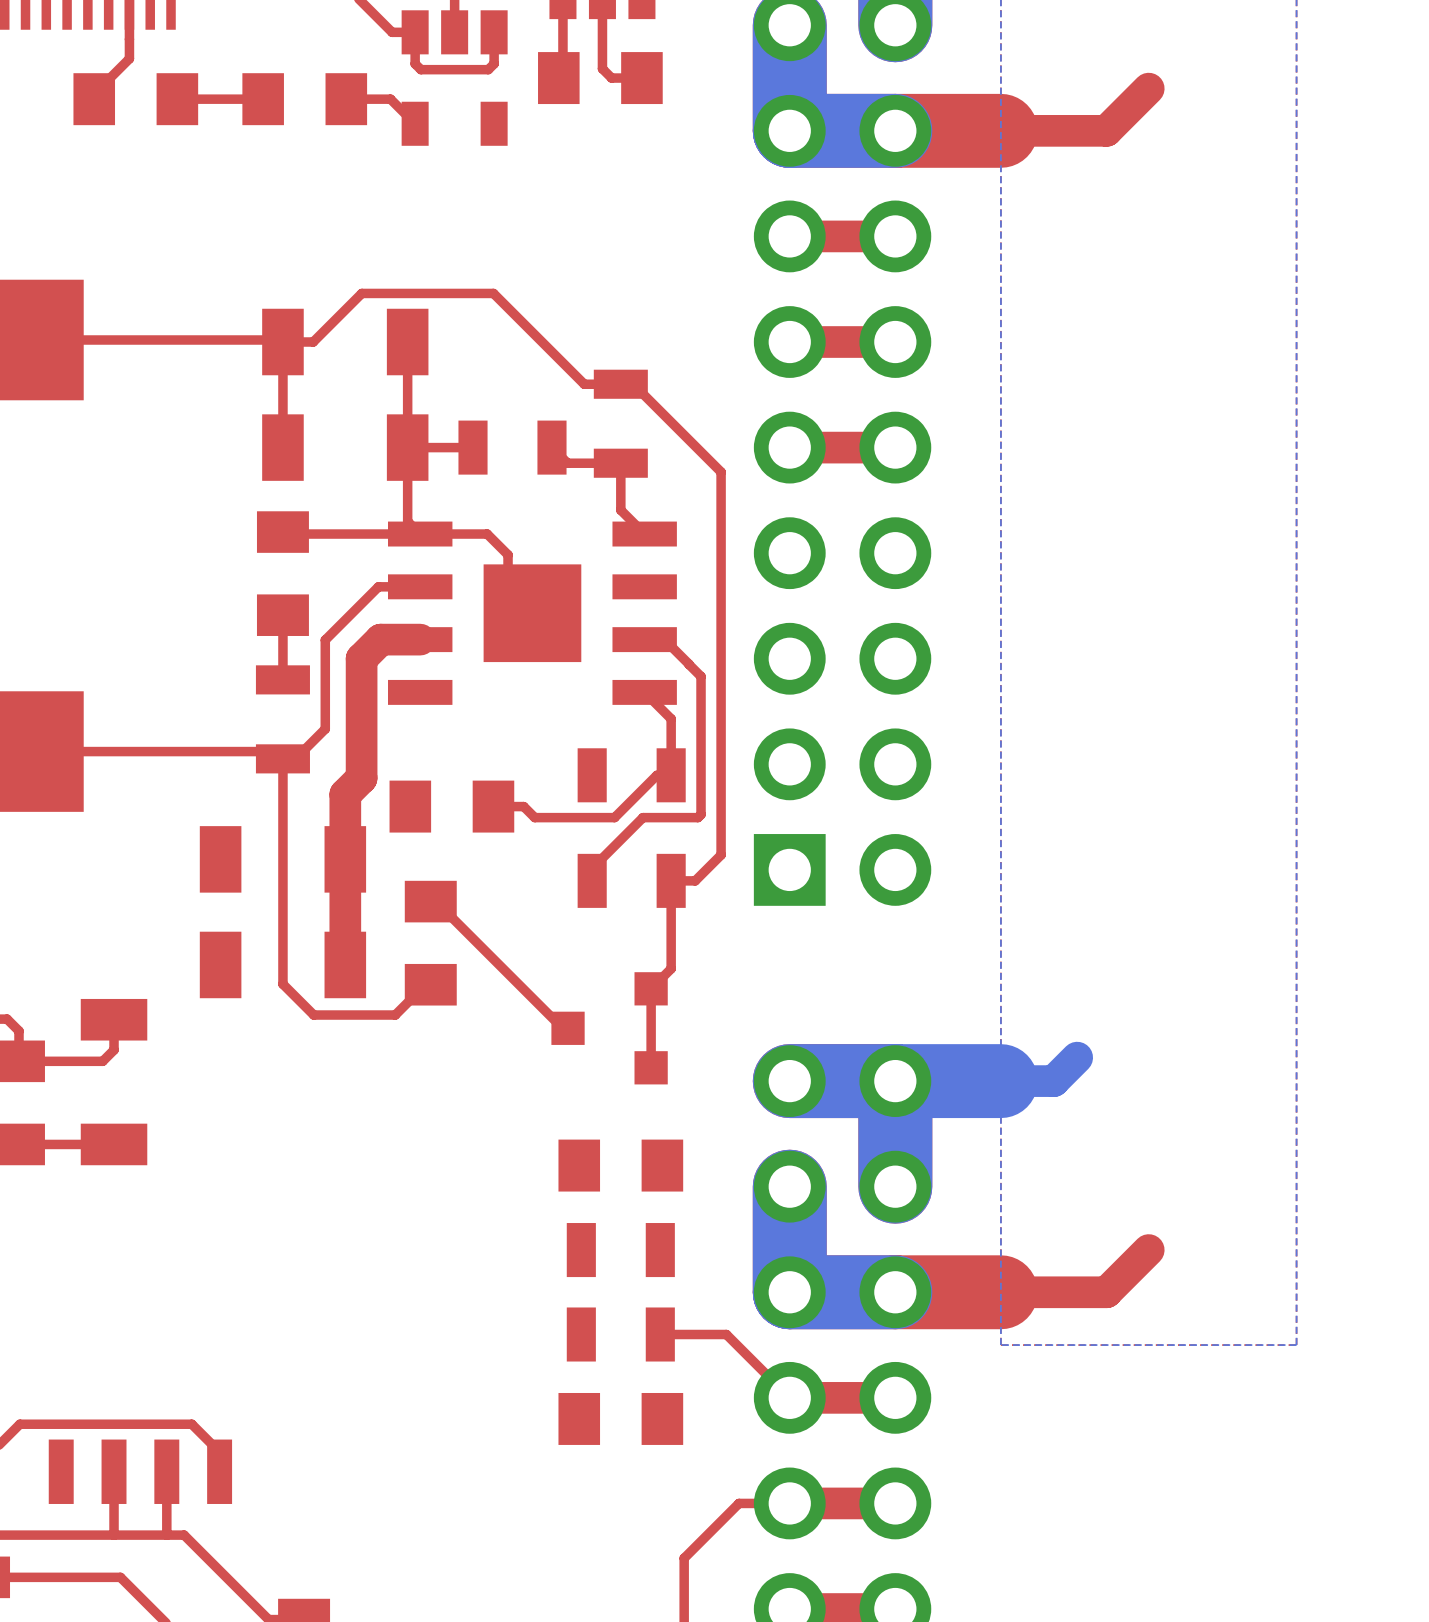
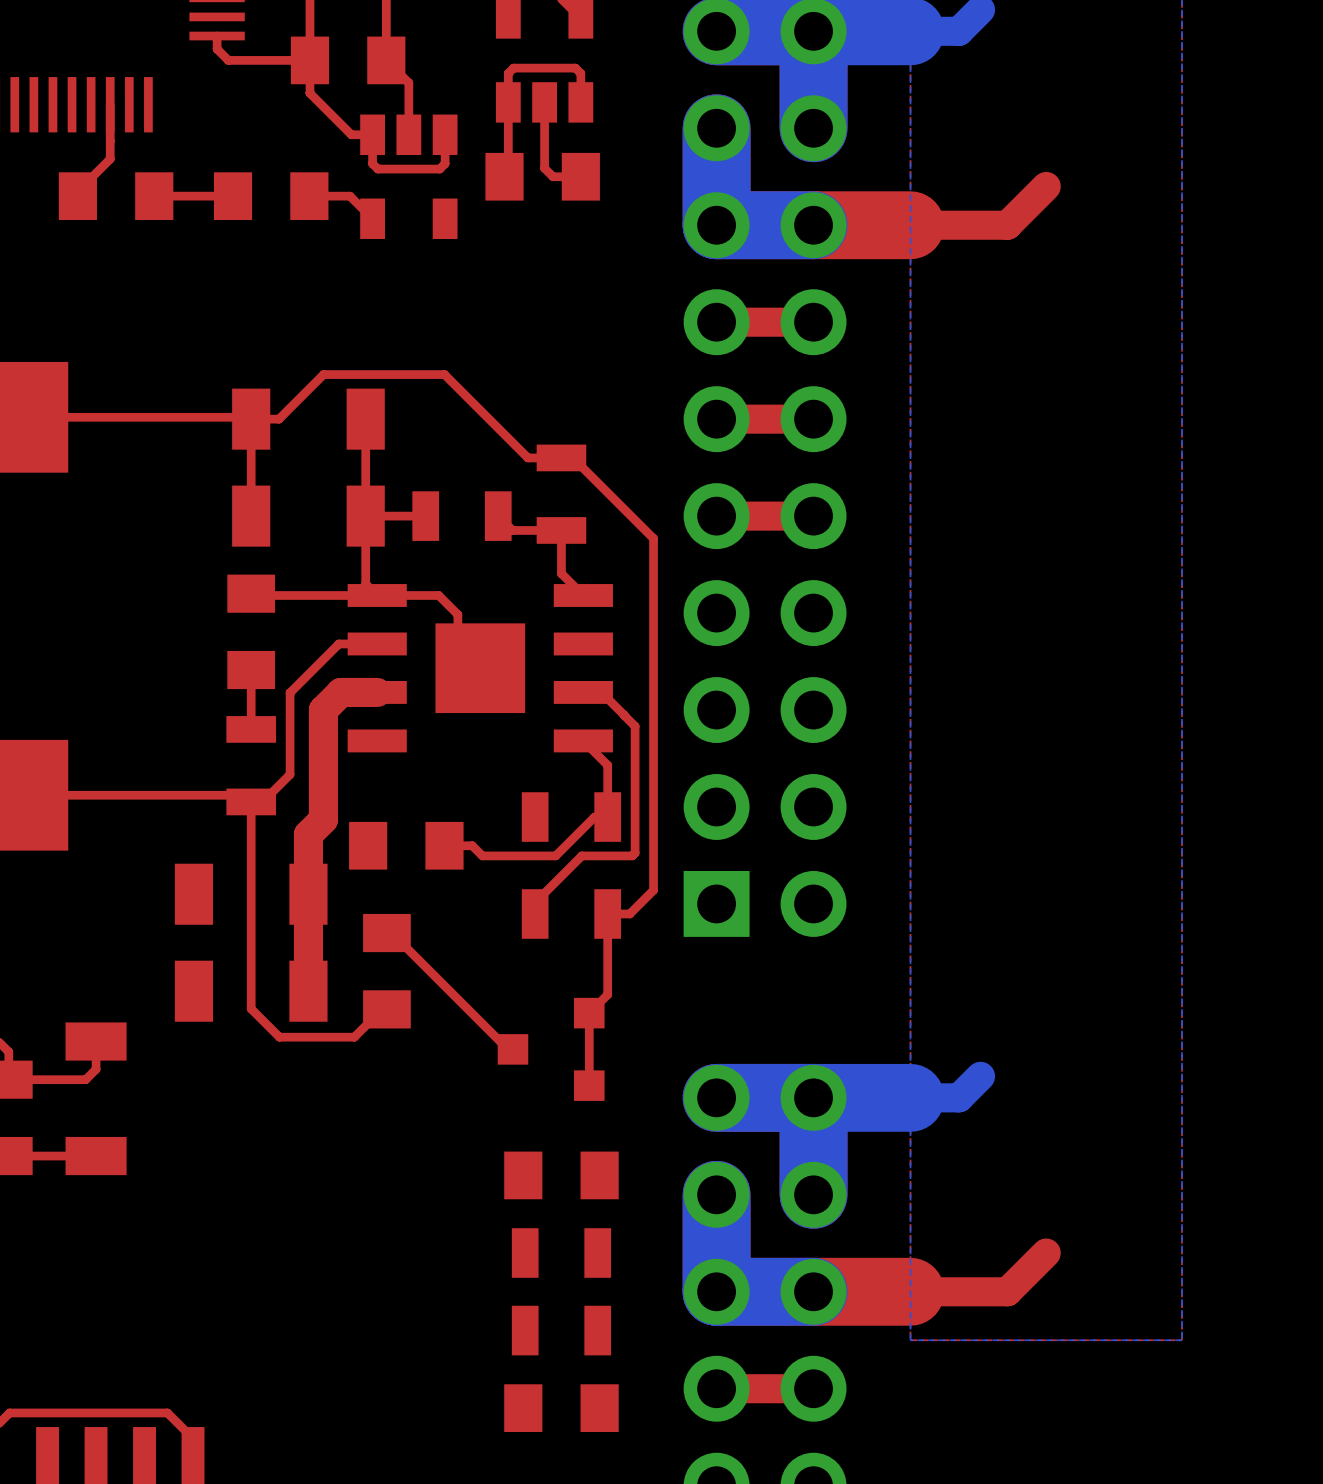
top track: (660, 1334) (726, 1334) (789, 1397) -> none

